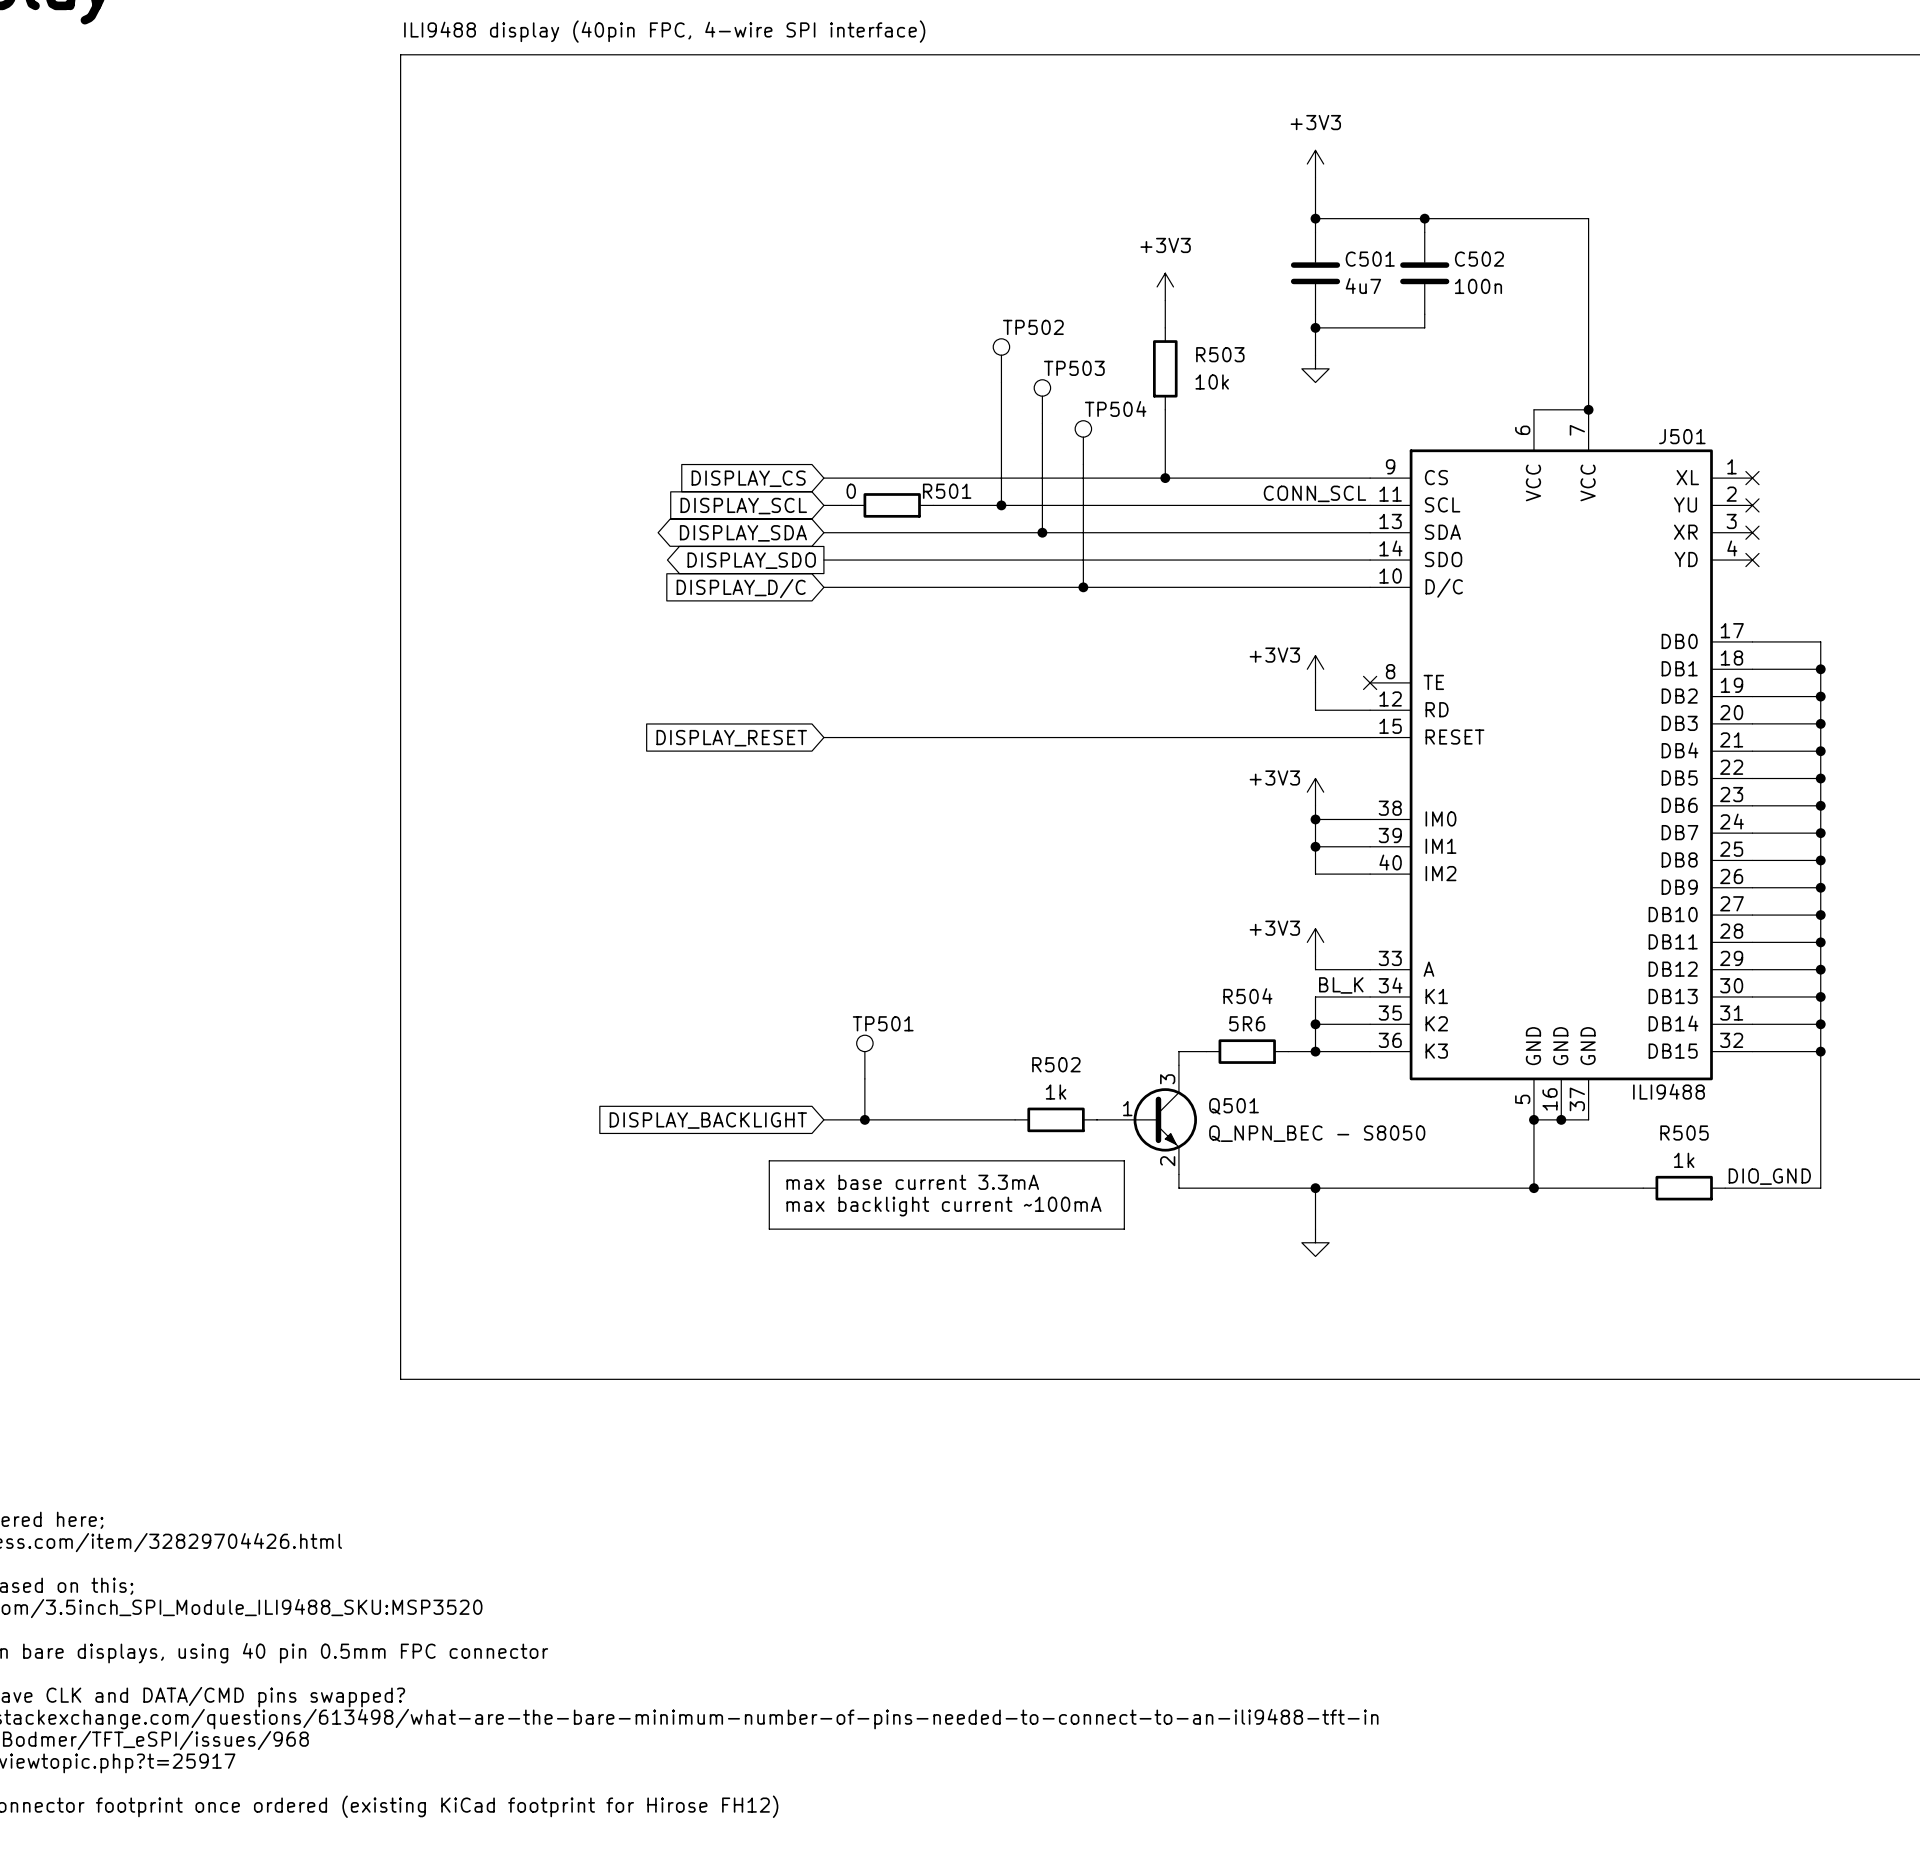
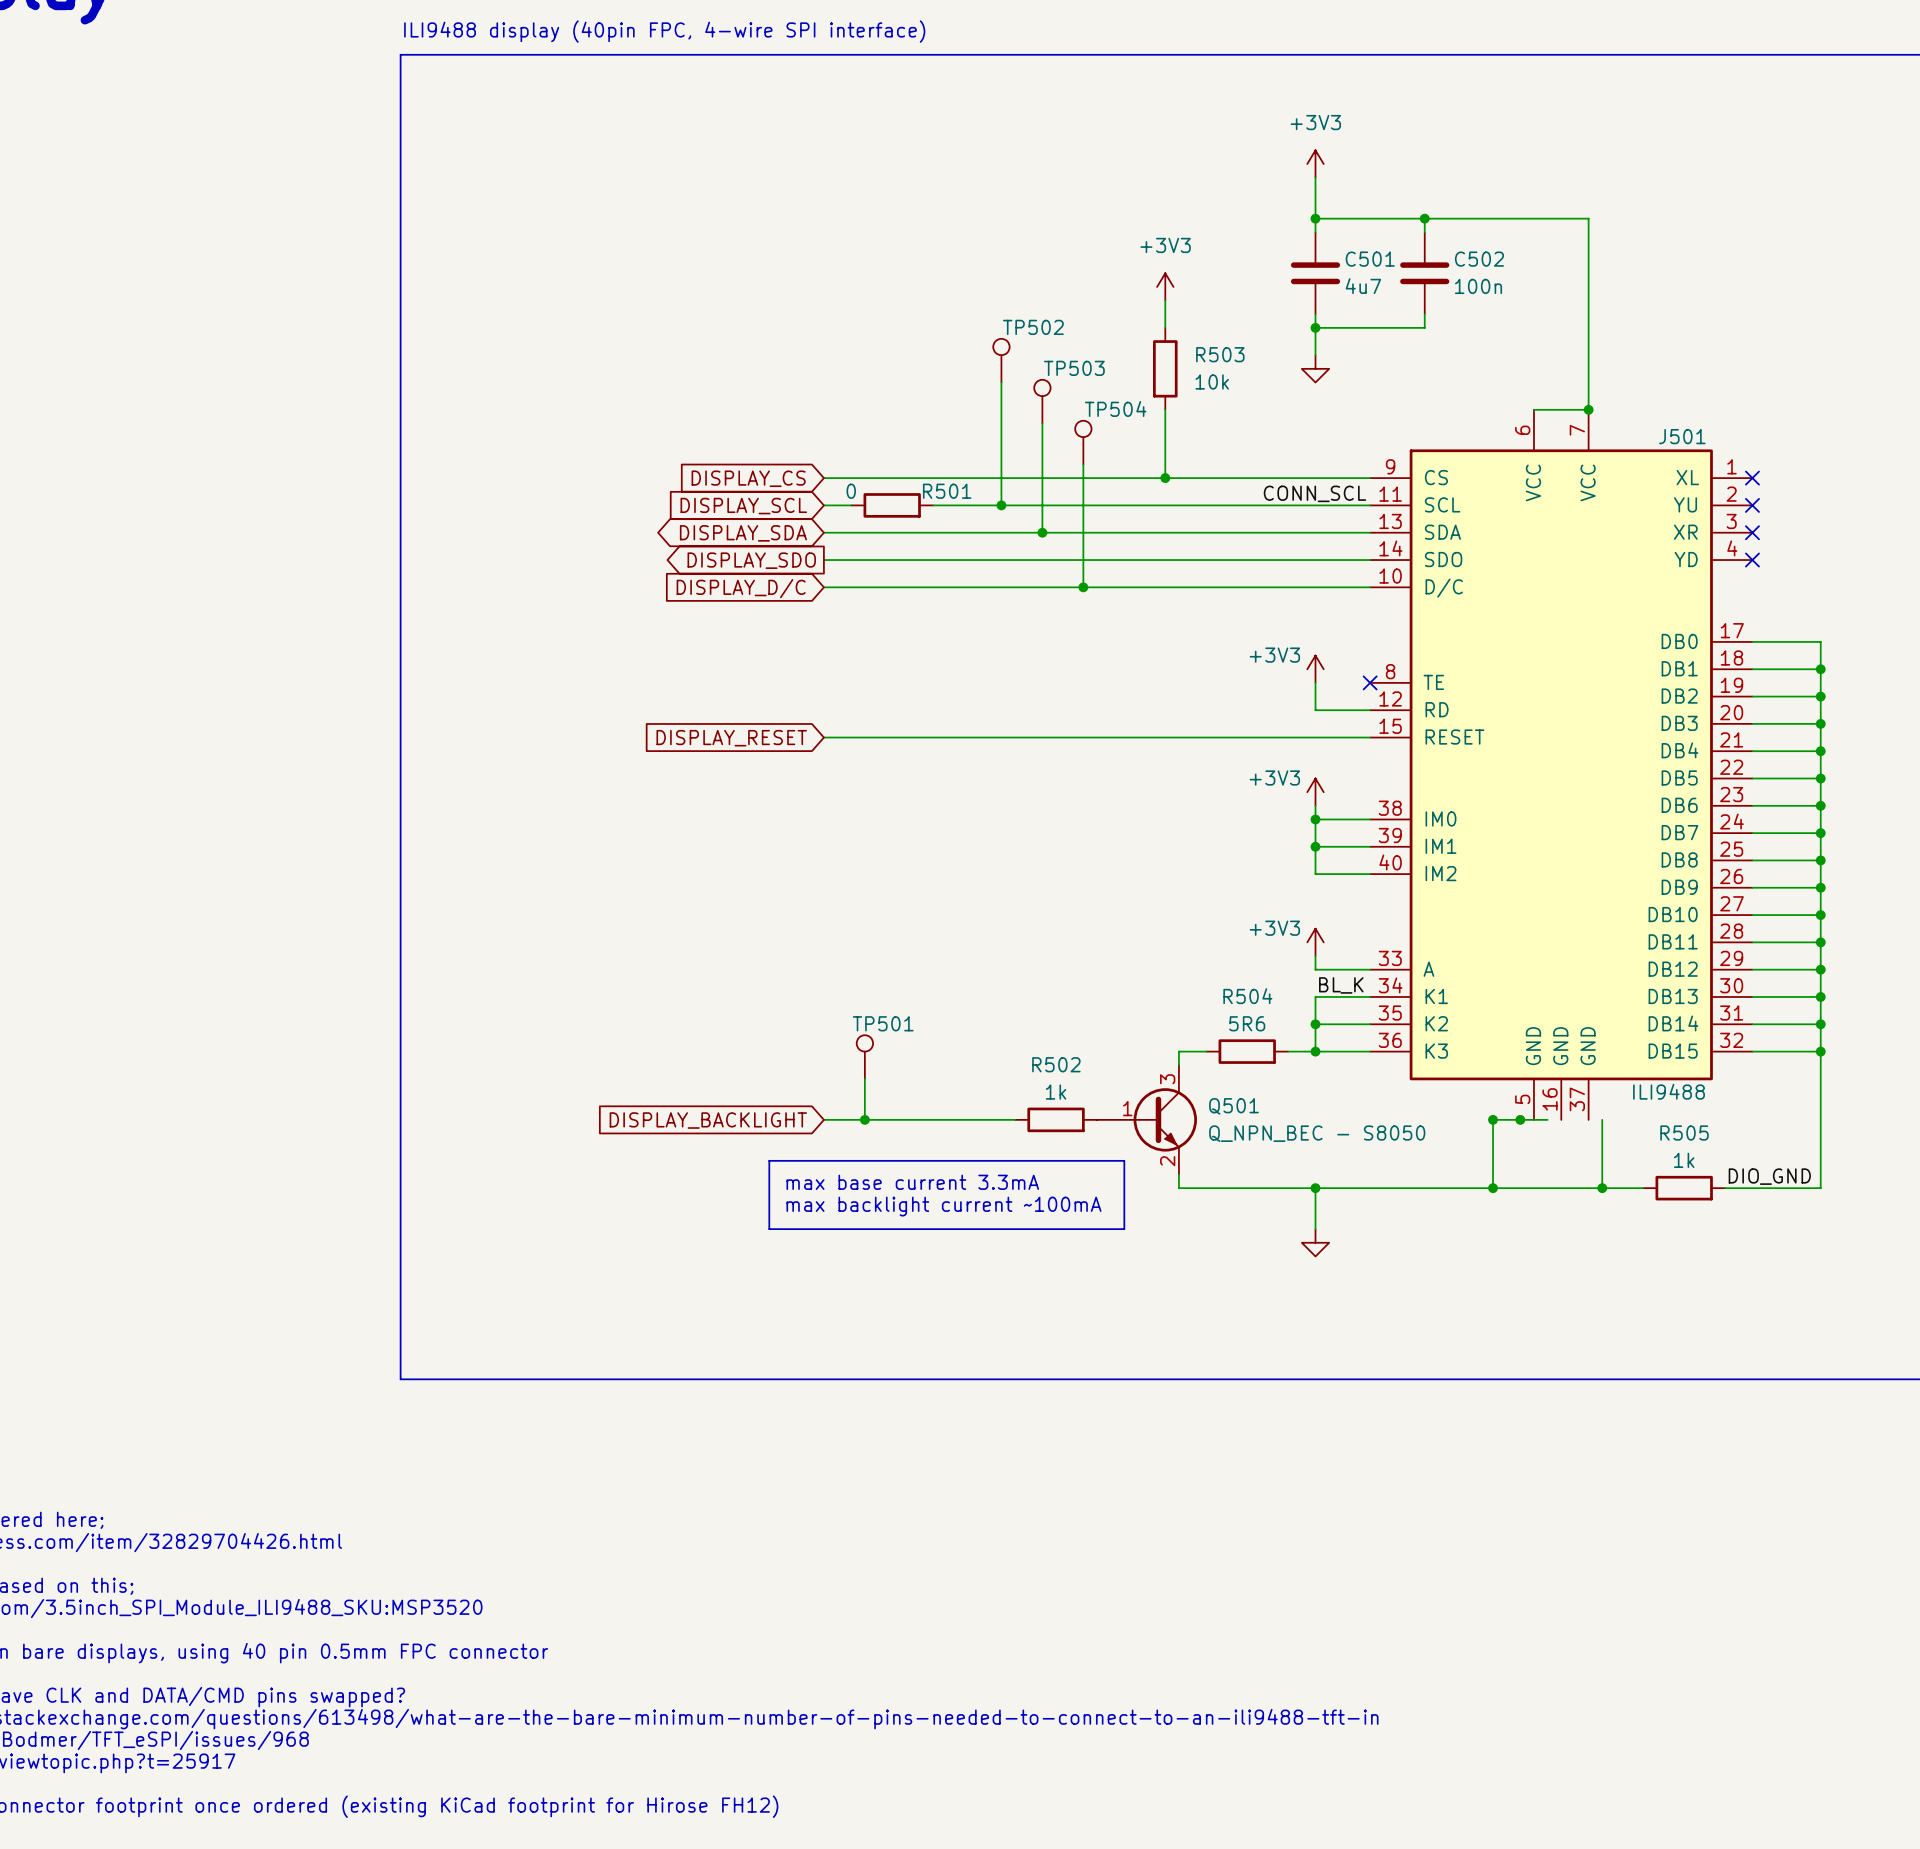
junction: none -> (1493, 1119)
wire: (1533, 1119) (1533, 1188) -> (1533, 1119) (1493, 1119) (1493, 1188)
junction position: (1533, 1119) -> (1520, 1119)
wire: (1547, 1119) (1588, 1119) -> none
junction: (1561, 1119) -> none
wire: none -> (1602, 1119) (1602, 1188)
junction: none -> (1493, 1188)
junction: (1533, 1188) -> none
junction: none -> (1602, 1188)

